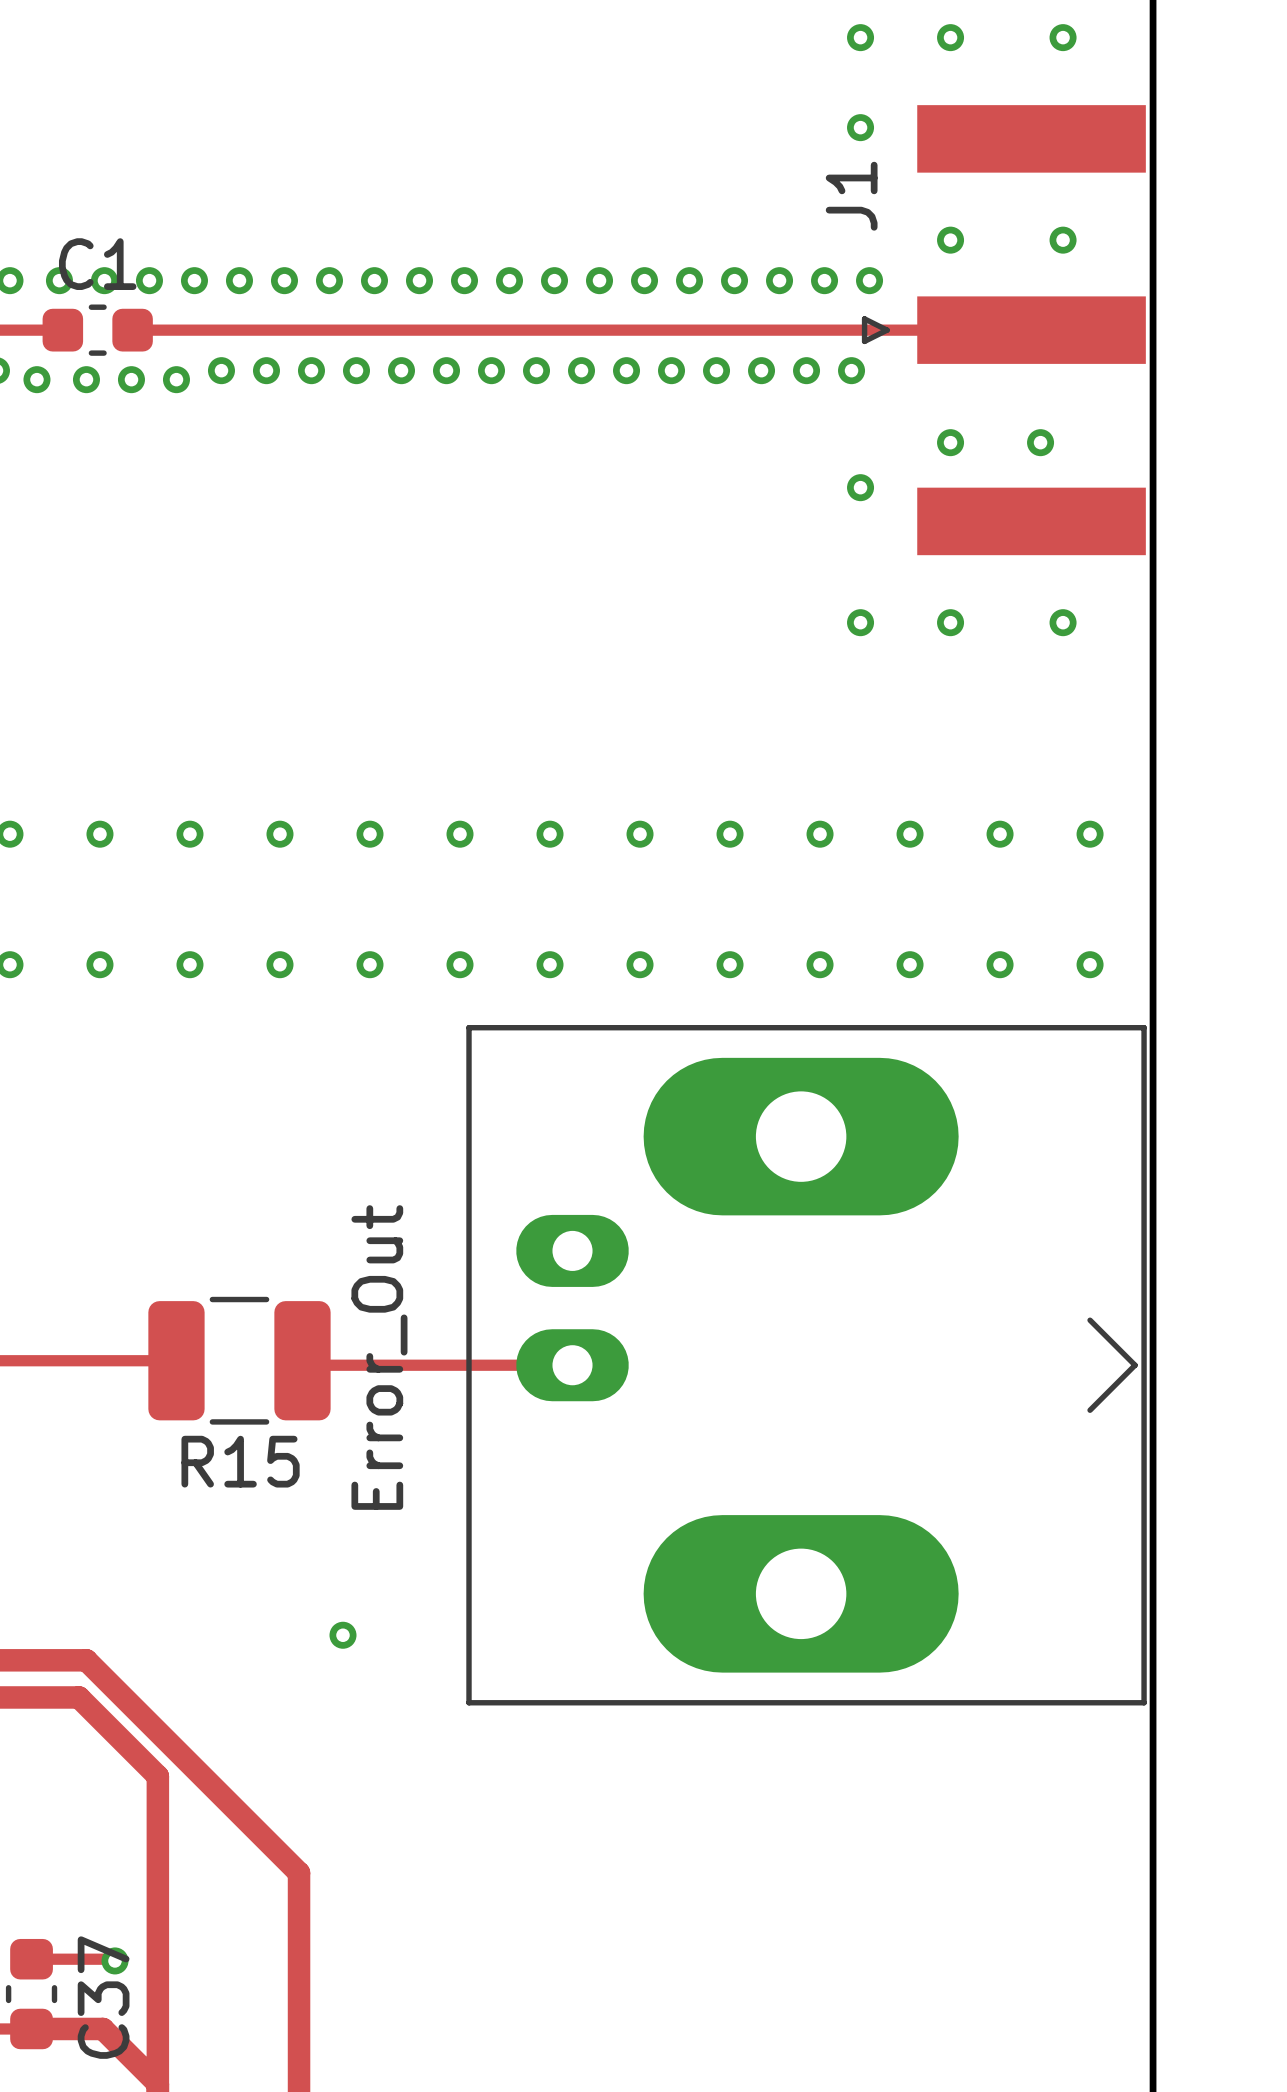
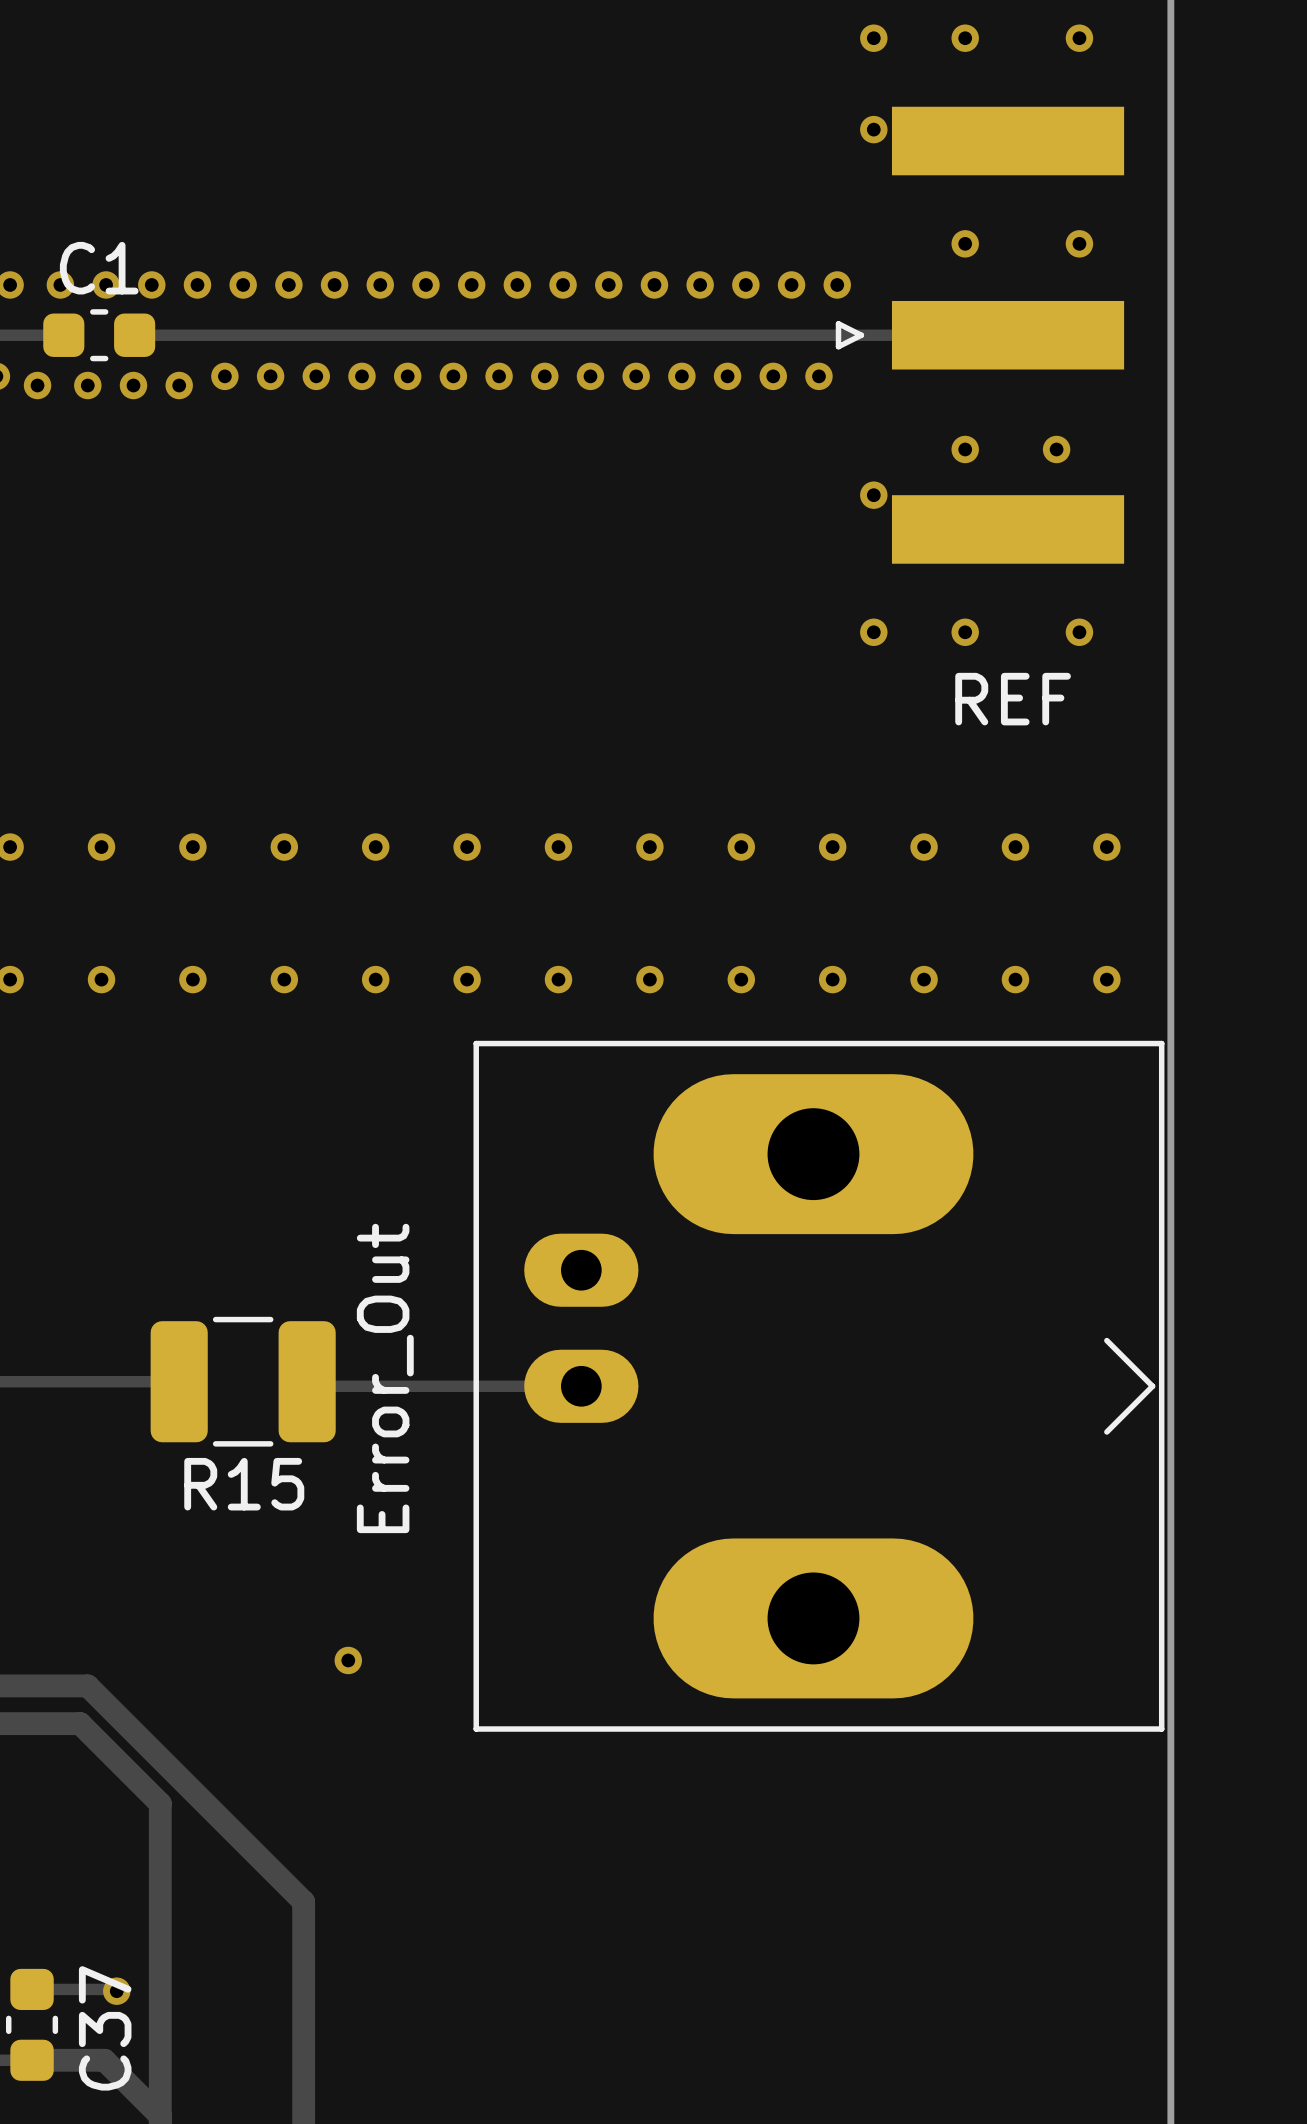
J1 name: J1 (851, 196) -> none
via: (869, 280) -> none
J1 position: (1003, 330) -> (979, 335)
via: (851, 370) -> none
J1 value: none -> REF (1013, 699)

